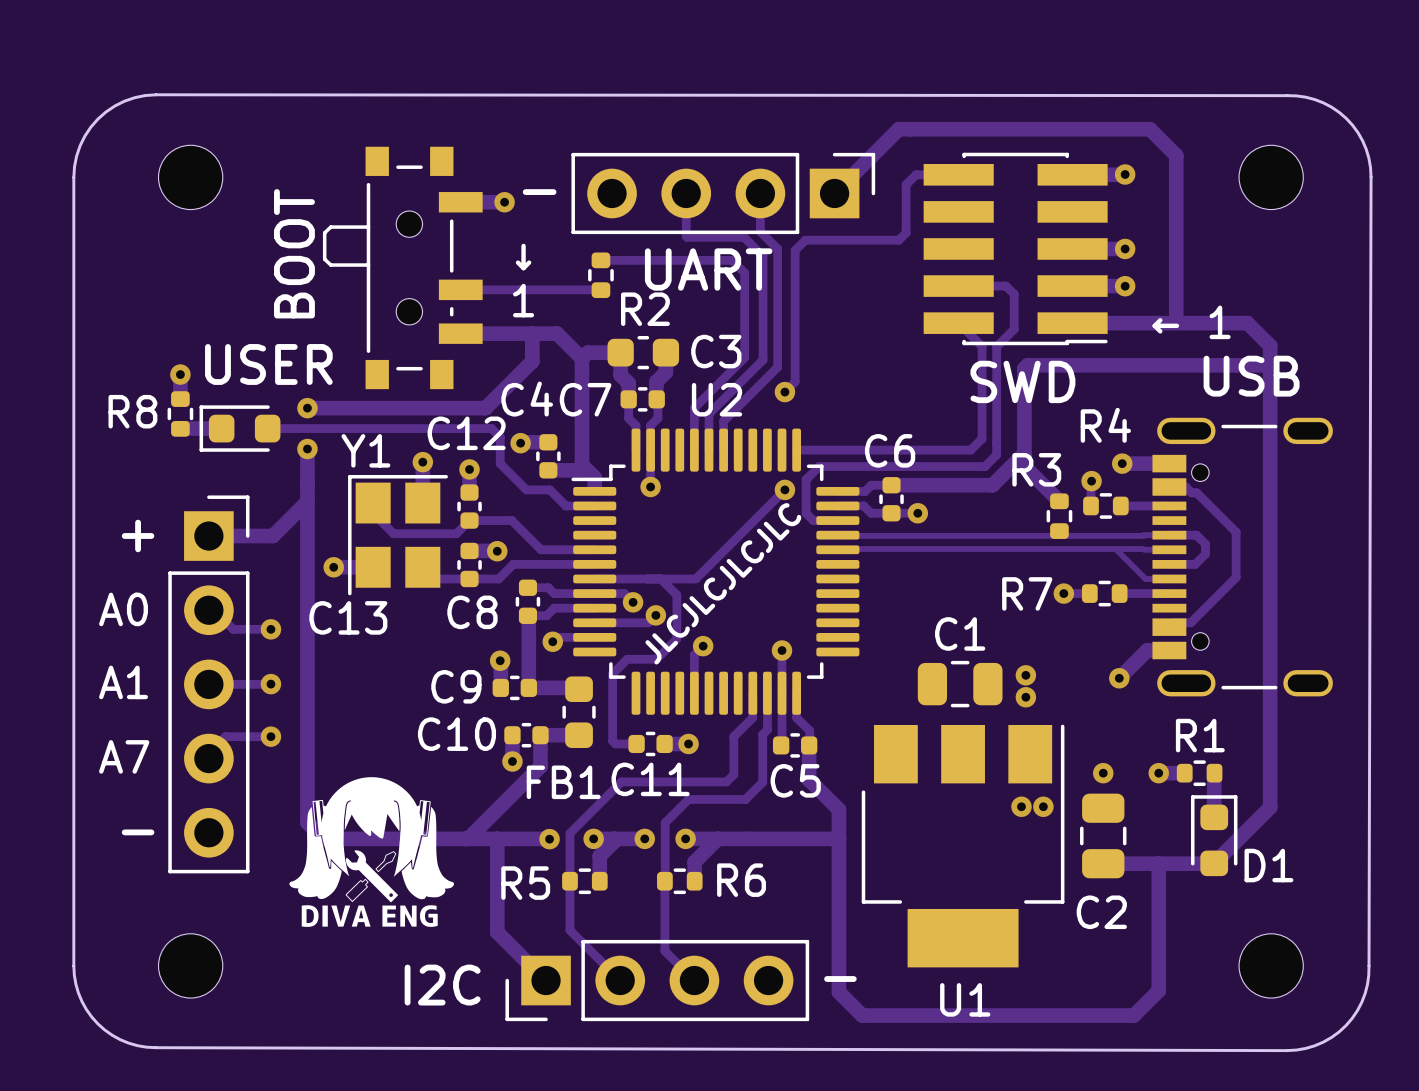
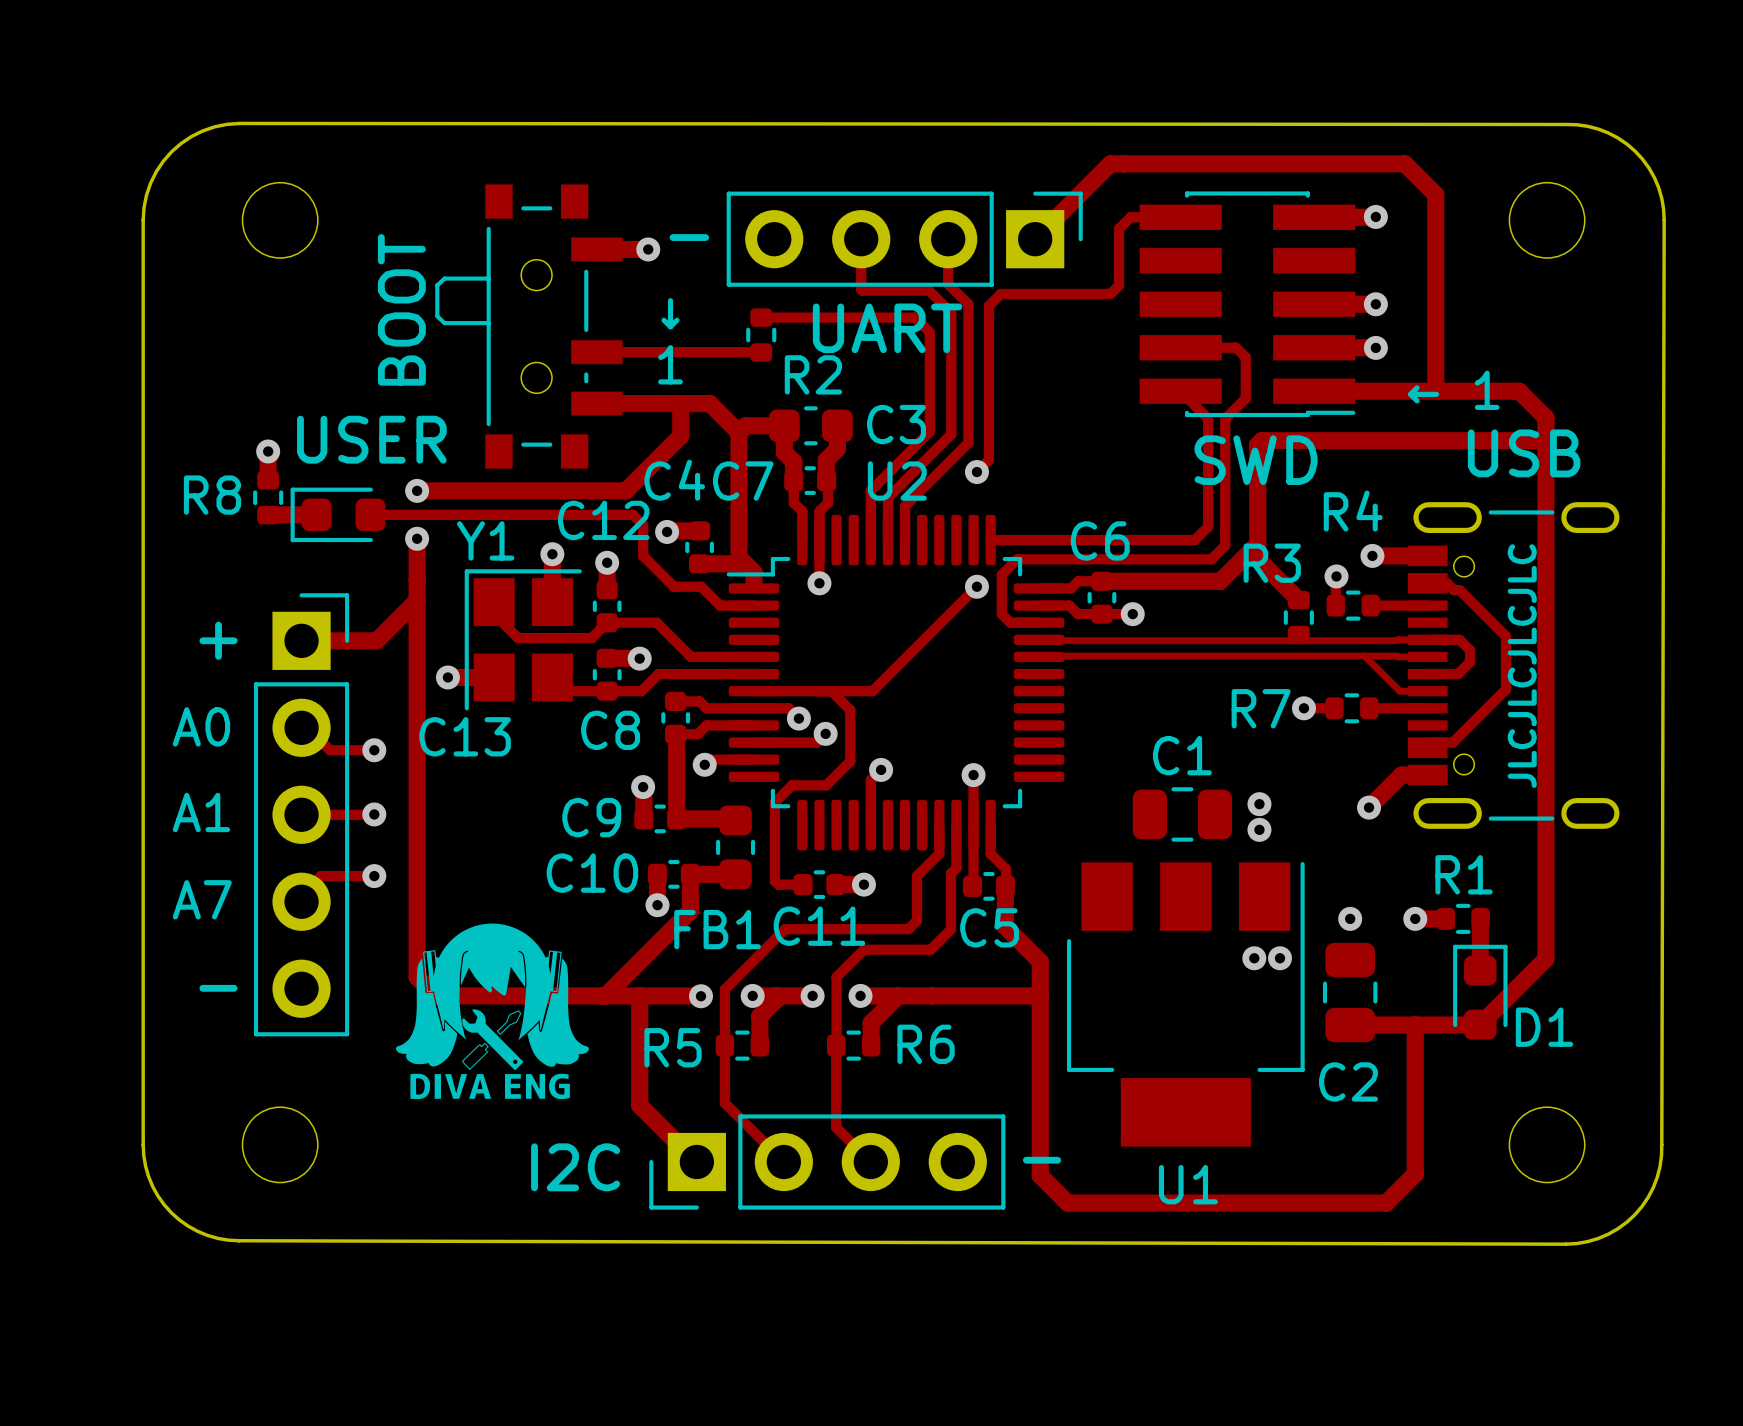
text rotation: 0° (723, 583) -> 45° counterclockwise (1522, 666)
text position: JLCJLCJLCJLC (723, 583) -> JLCJLCJLCJLC (1522, 666)

